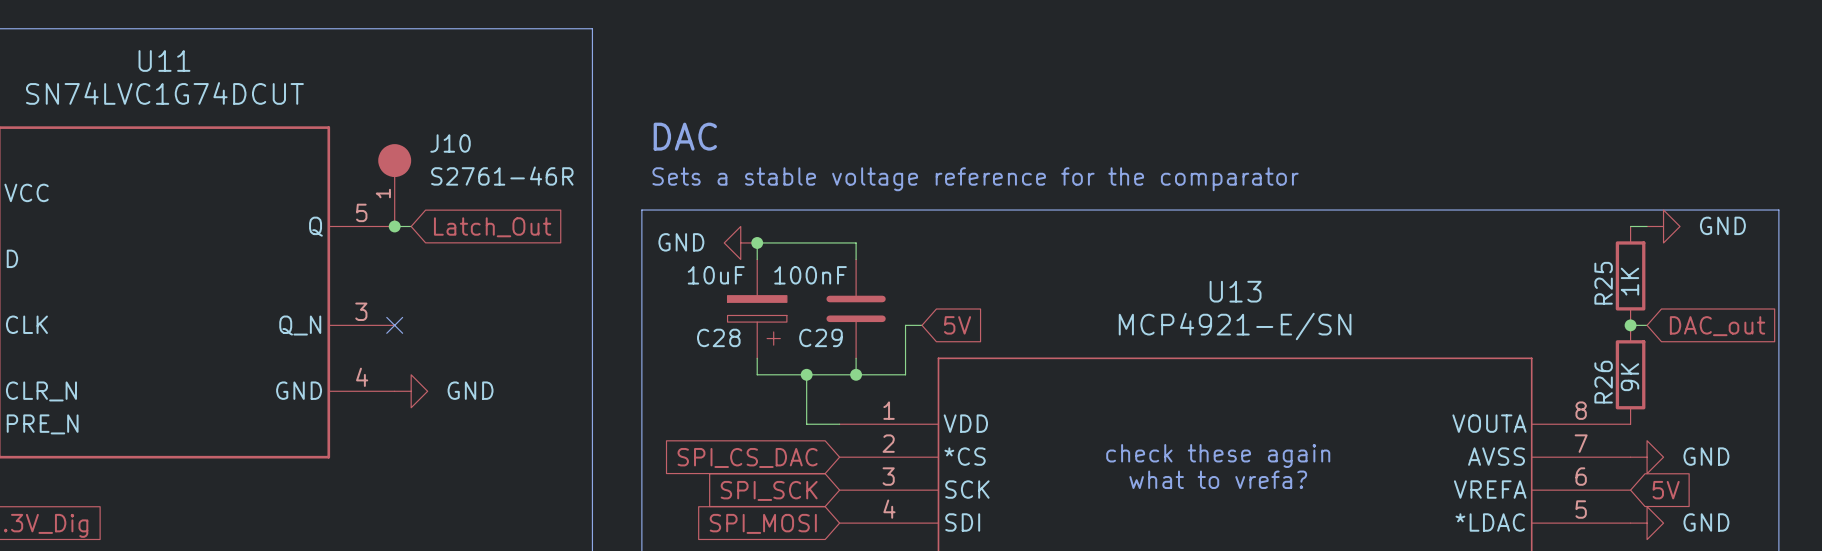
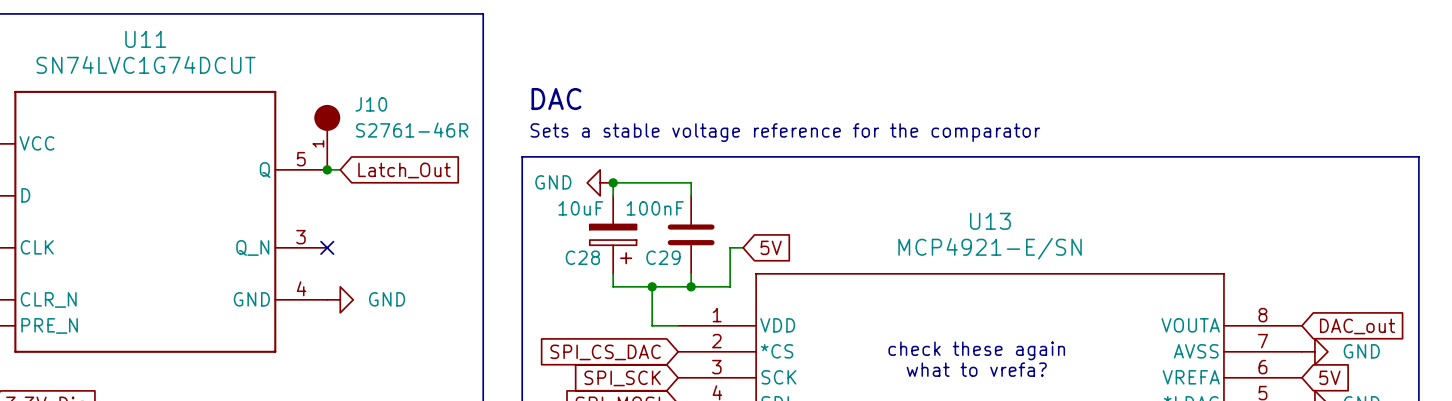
wire: (1630, 226) (1647, 226) -> none
power symbol: GND (1663, 226) -> none
R25: 1K (1630, 275) -> none
wire: (1630, 325) (1647, 325) -> none
junction: (1630, 325) -> none
global label position: DAC_out (1717, 326) -> DAC_out (1357, 326)
R26: 9K (1630, 374) -> none

